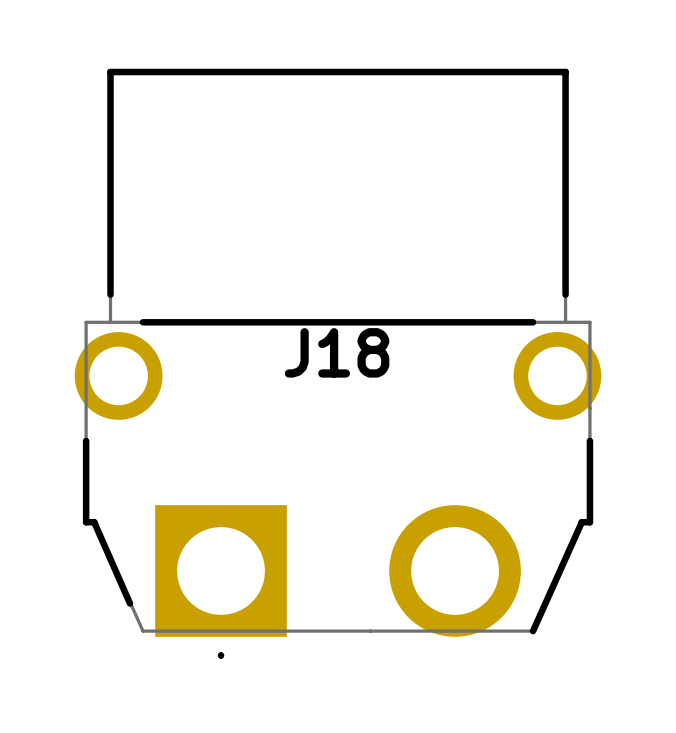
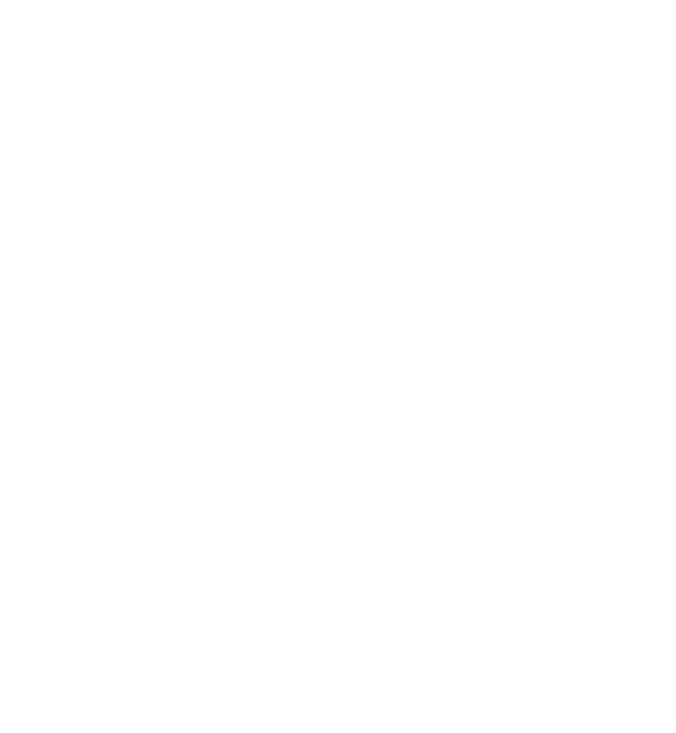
J18: (338, 363) -> none

